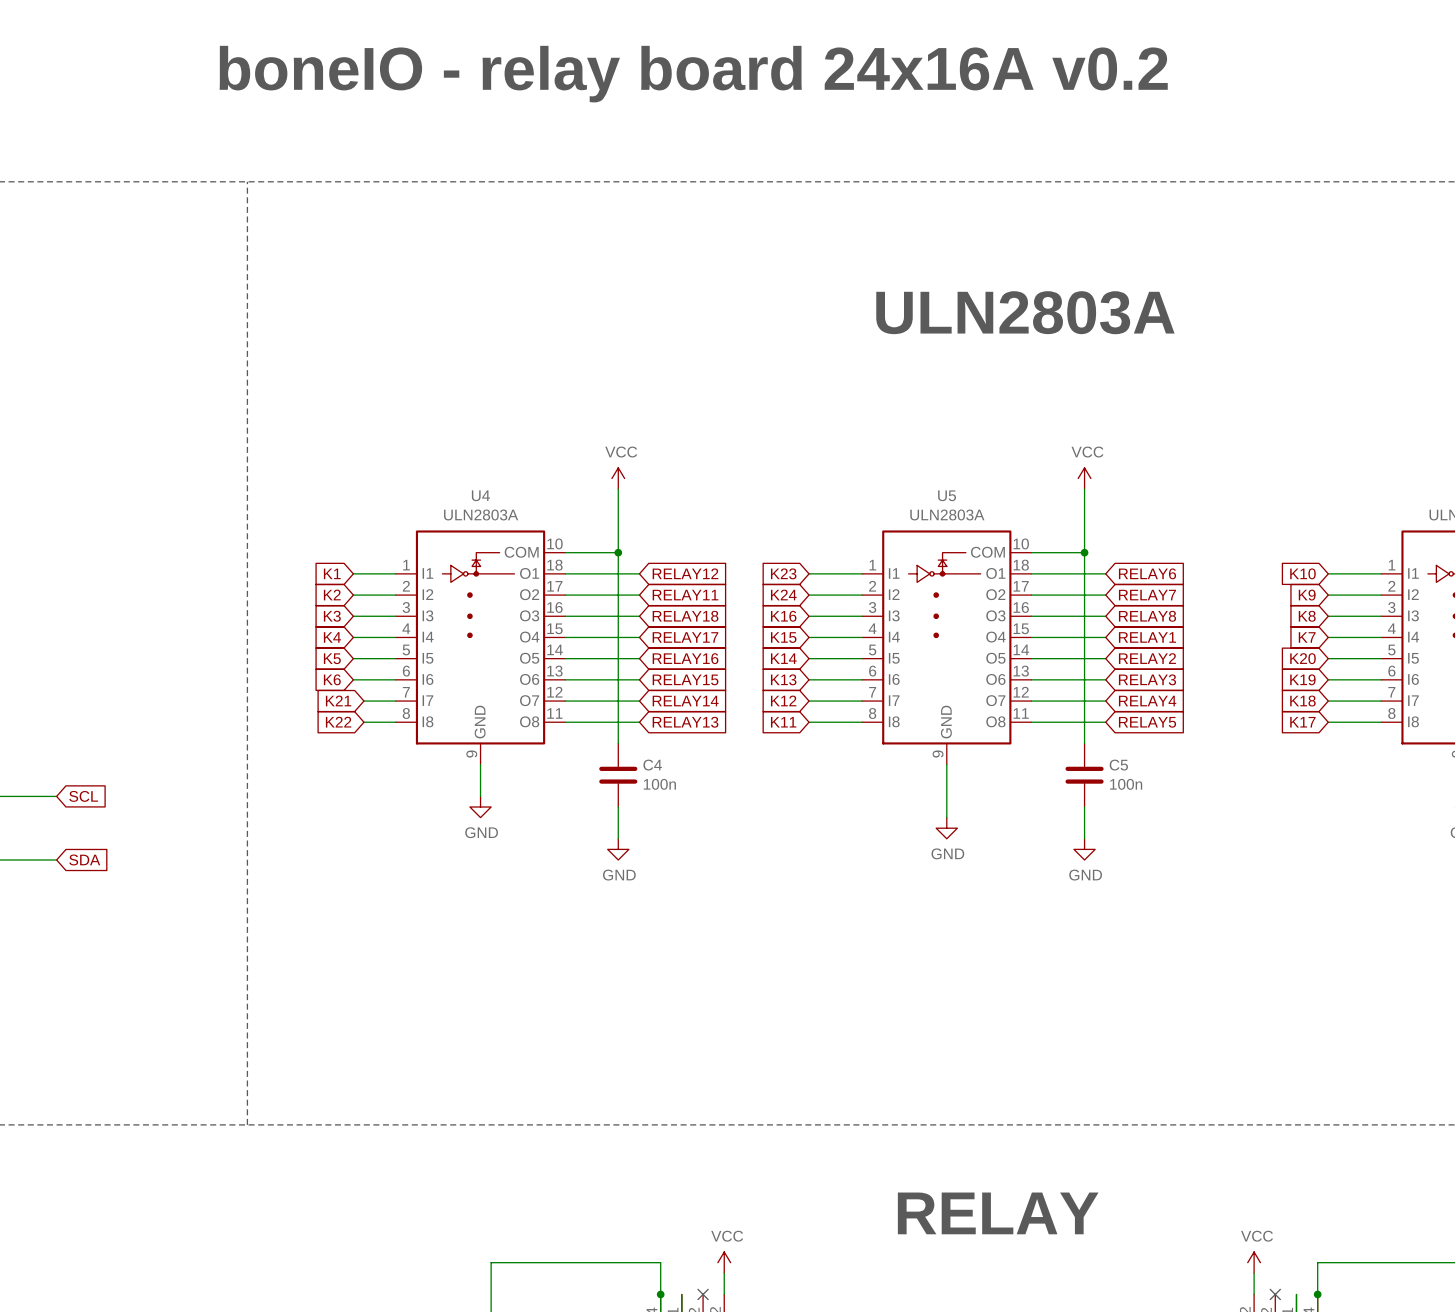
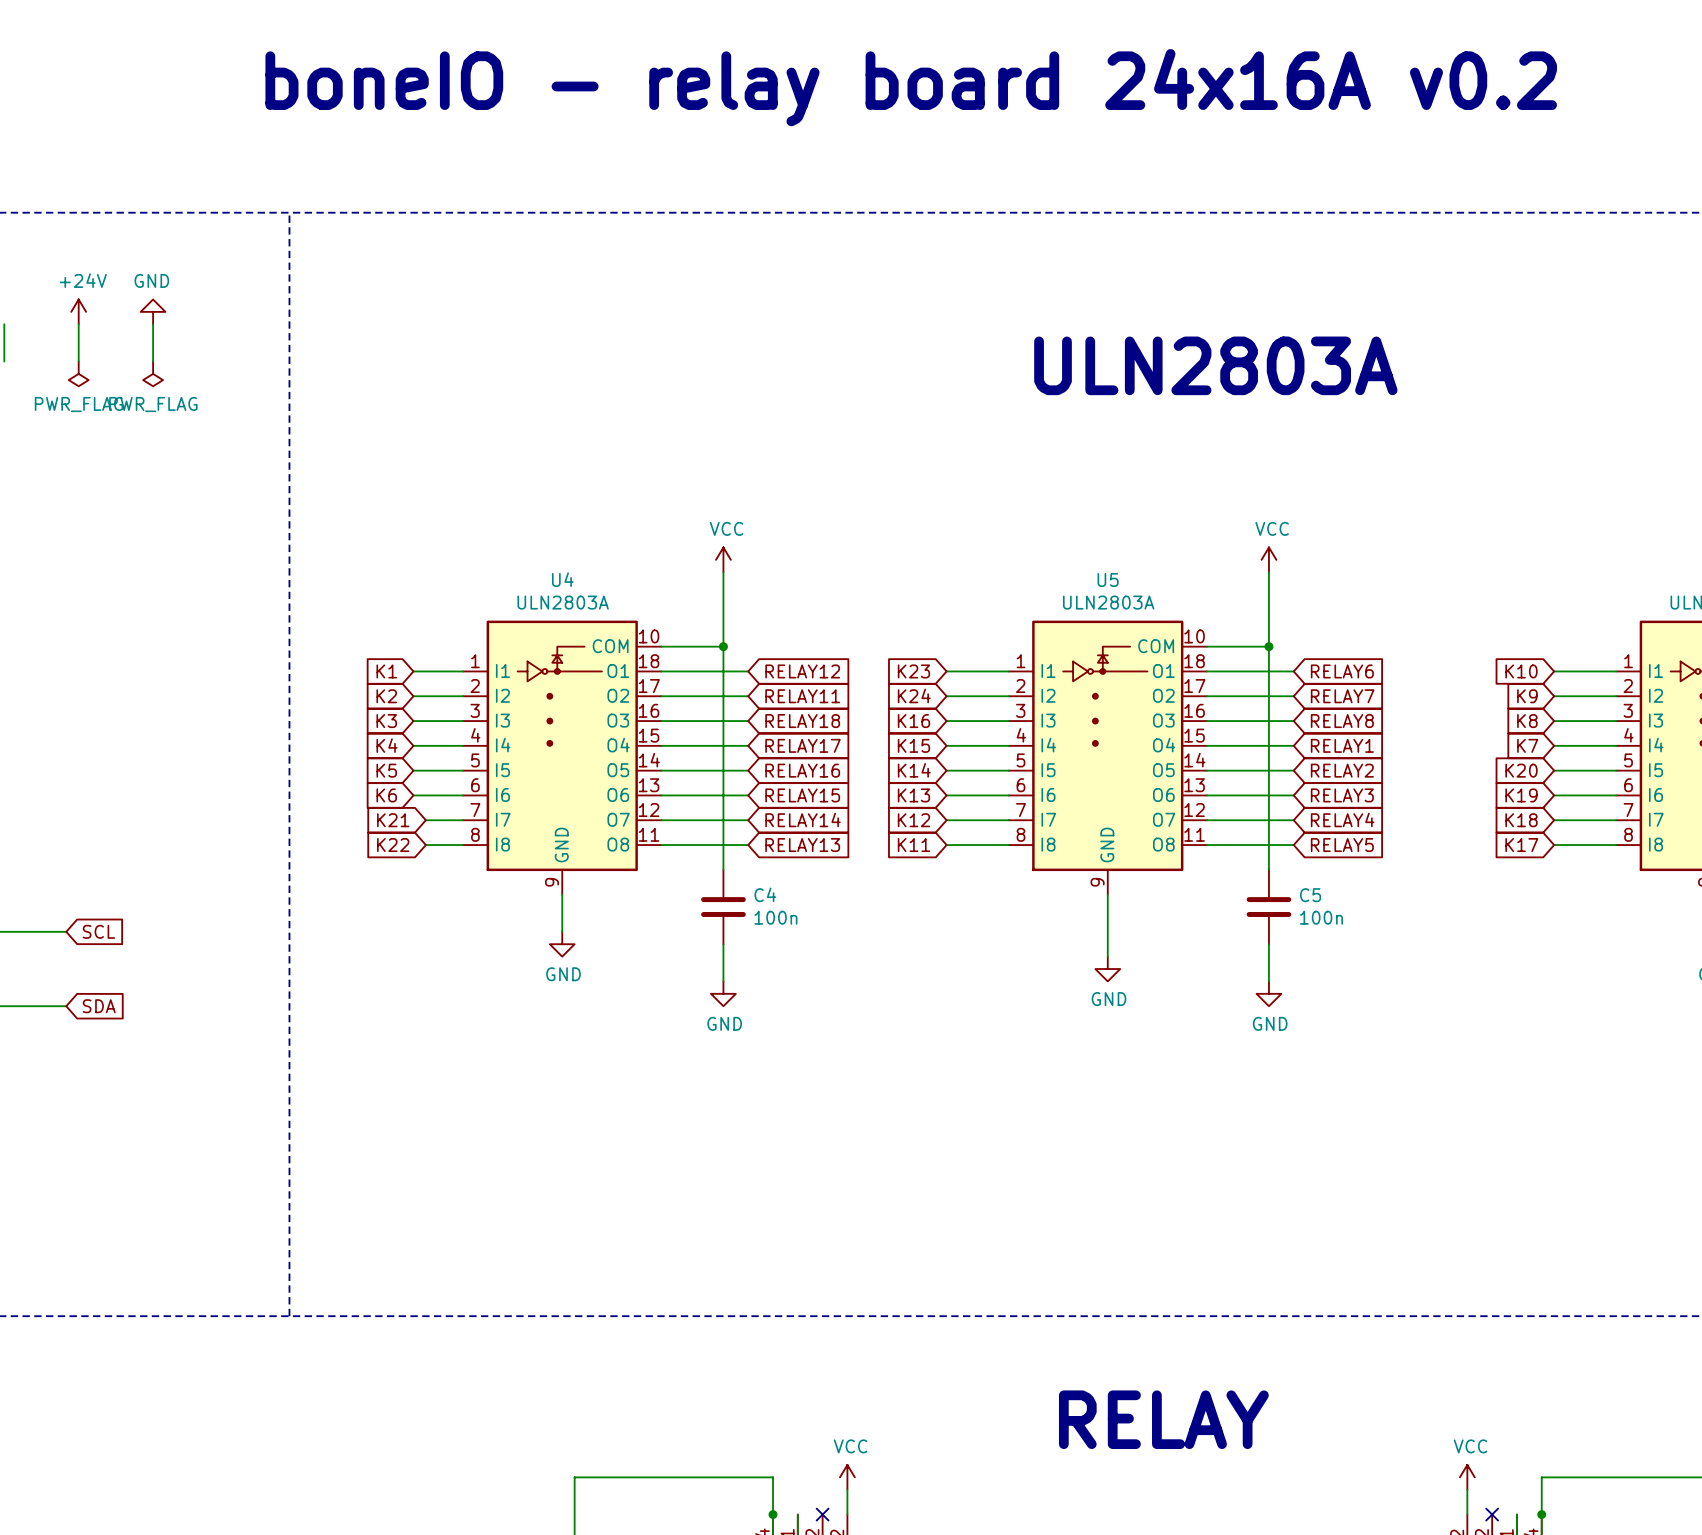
power symbol: none -> +24V (78, 311)
power symbol: none -> GND (153, 311)
wire: none -> (4, 324) (4, 361)
wire: none -> (78, 324) (78, 361)
wire: none -> (153, 324) (153, 361)
power symbol: none -> PWR_FLAG (78, 373)
power symbol: none -> PWR_FLAG (153, 373)

